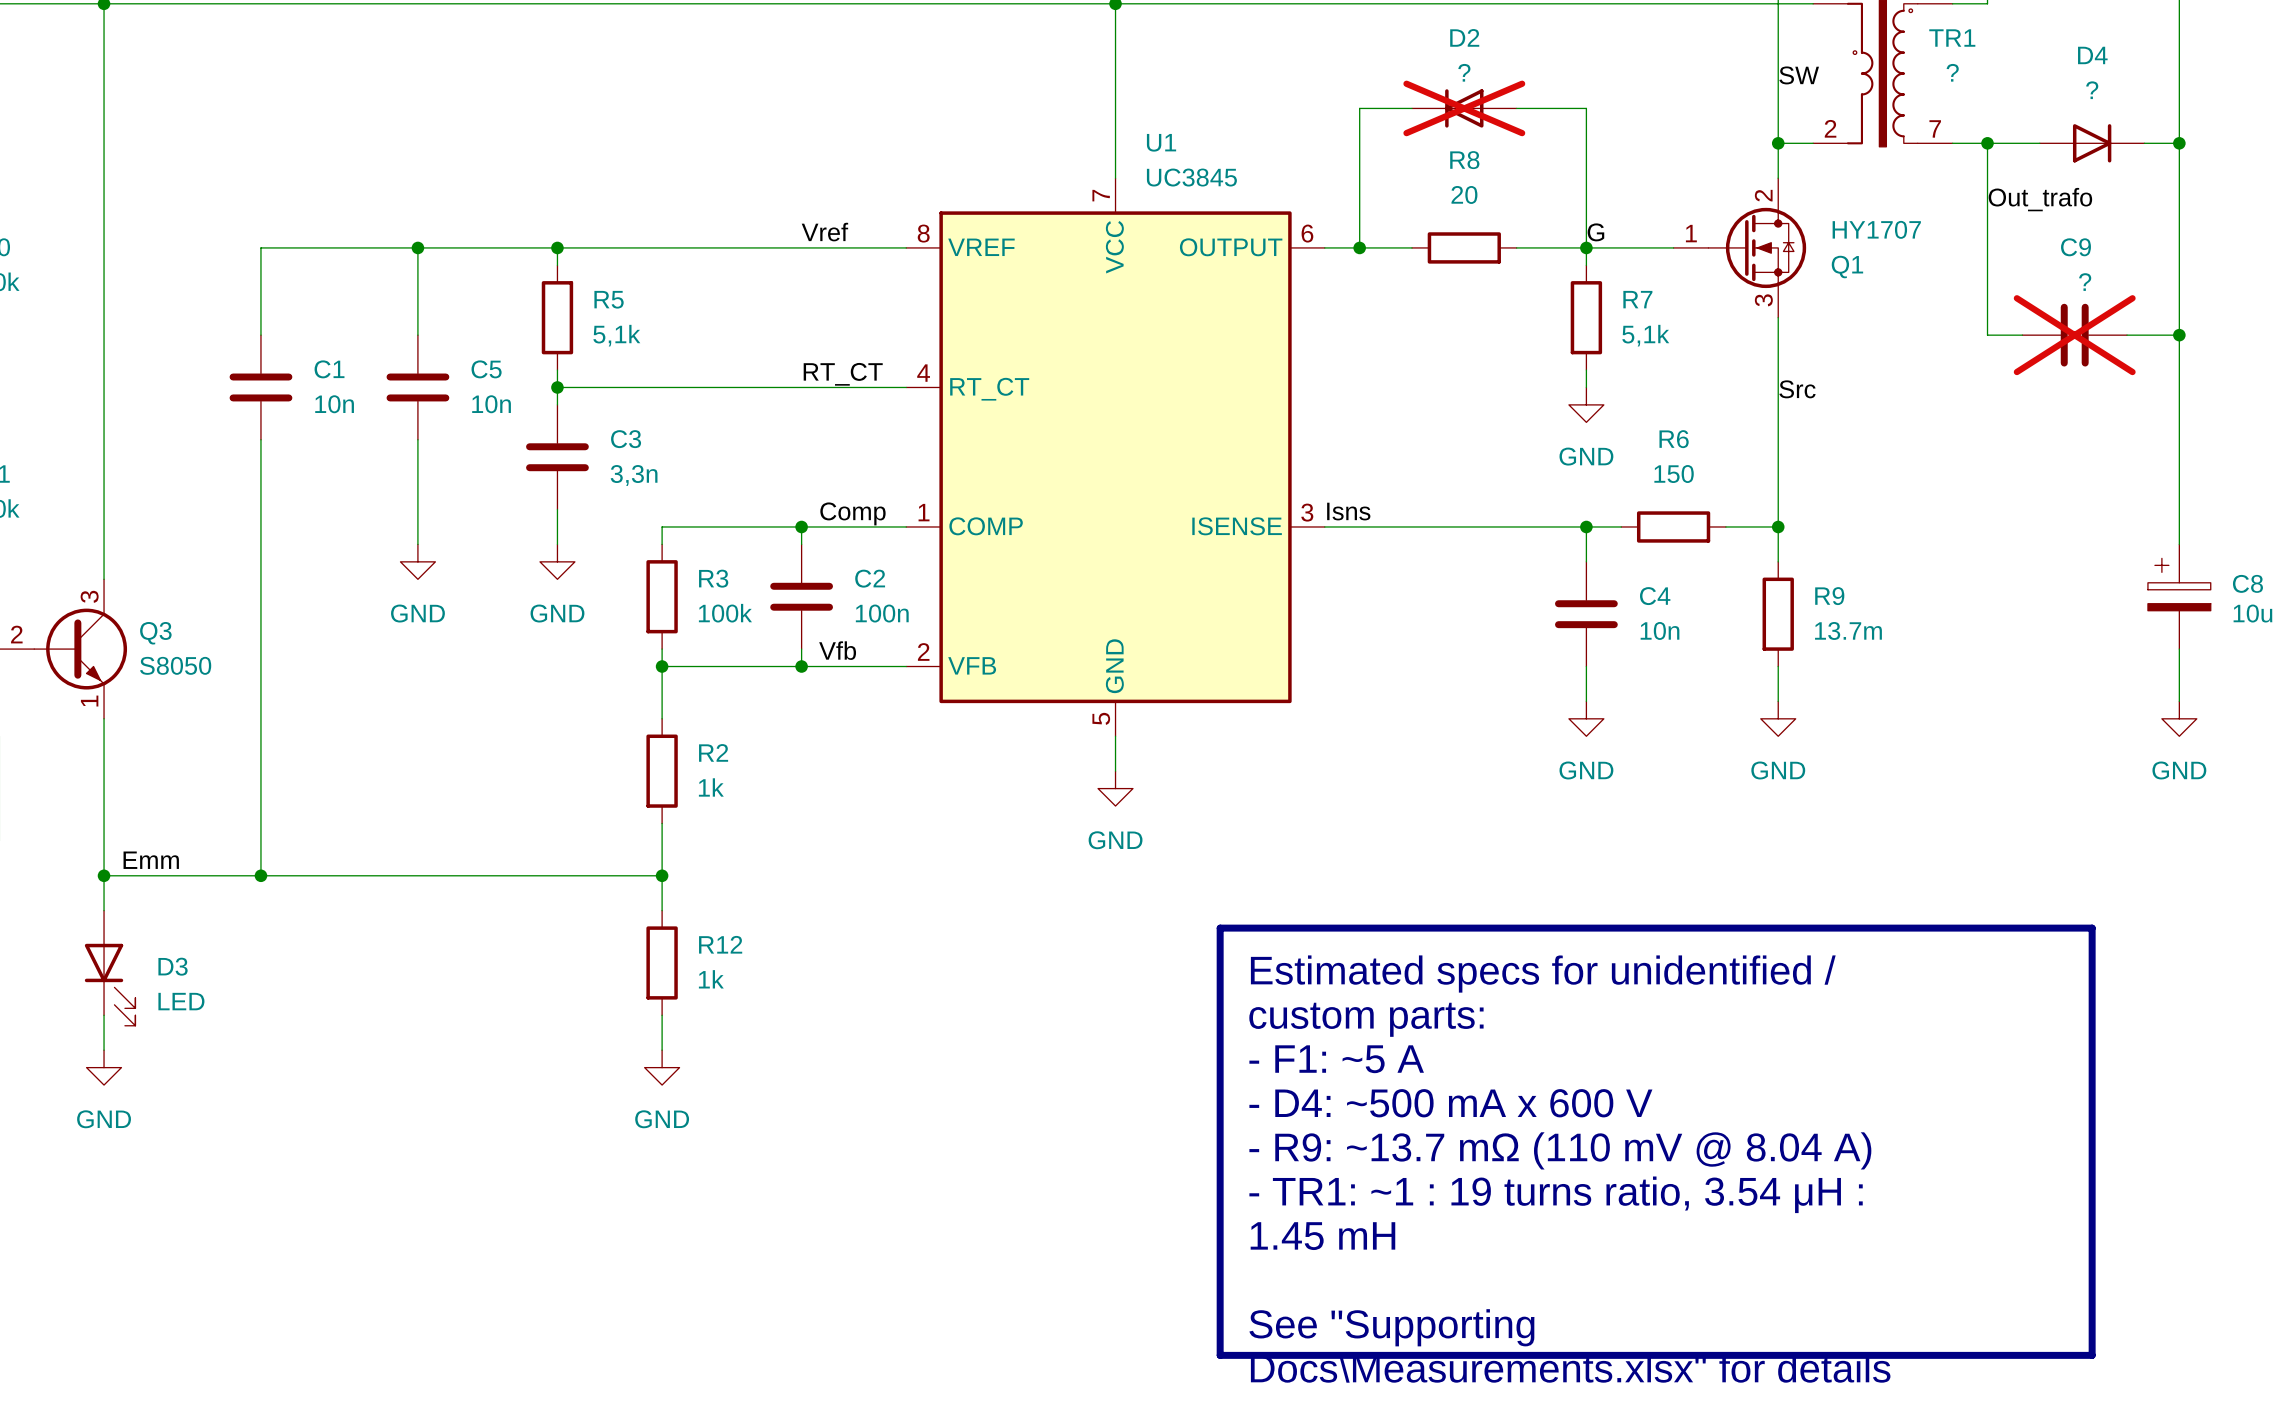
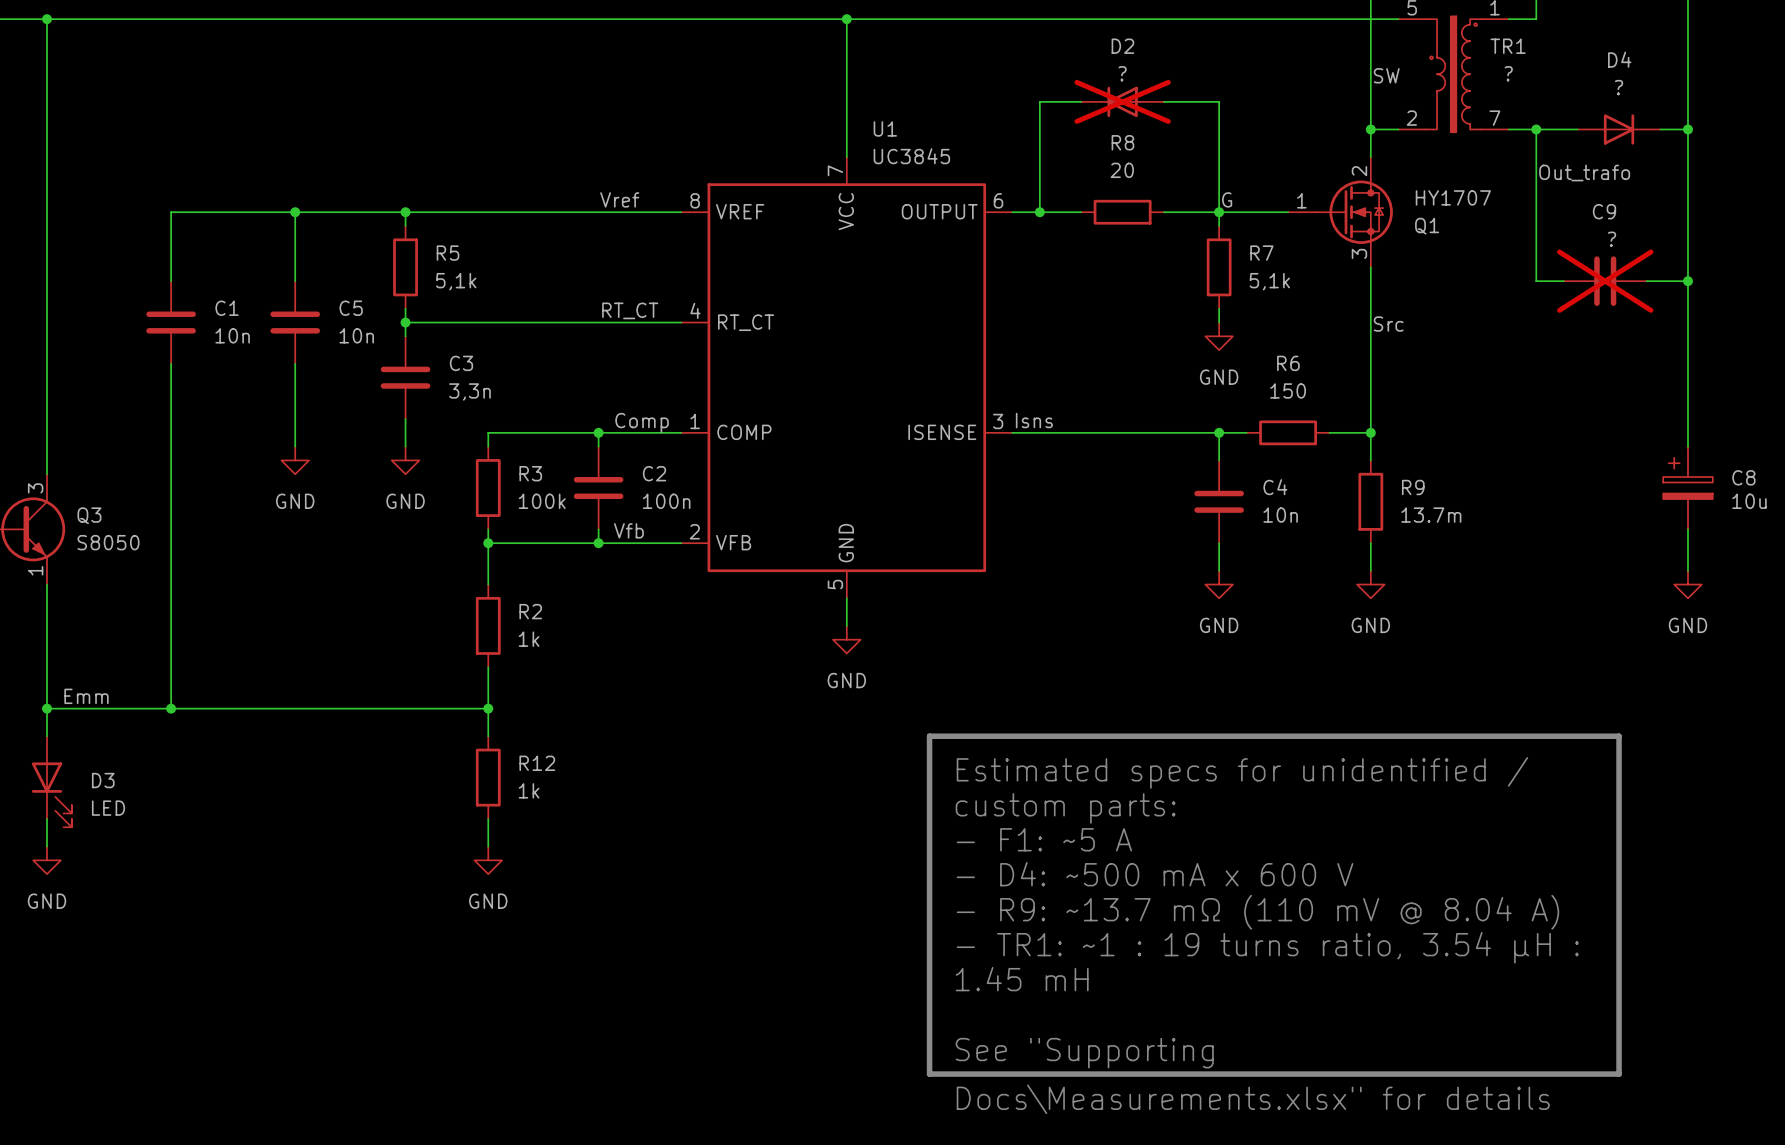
line: (1220, 928) (2092, 928) -> (929, 750) (929, 736) (1619, 736) (1619, 750)
text position: Estimated specs for unidentified / (1543, 974) -> Estimated specs for unidentified / (1242, 772)
text position: custom parts: (1366, 1019) -> custom parts: (1065, 808)
text position: - F1: ~5 A (1336, 1059) -> - F1: ~5 A (1044, 839)
text position: - D4: ~500 mA x 600 V (1450, 1103) -> - D4: ~500 mA x 600 V (1155, 874)
text position: - R9: ~13.7 mΩ (110 mV @ 8.04 A) (1560, 1150) -> - R9: ~13.7 mΩ (110 mV @ 8.04 A) (1257, 912)
text position: - TR1: ~1 : 19 turns ratio, 3.54 μH : (1556, 1194) -> - TR1: ~1 : 19 turns ratio, 3.54 μH : (1267, 947)
text position: 1.45 mH (1322, 1236) -> 1.45 mH (1022, 979)
text position: See "Supporting (1391, 1327) -> See "Supporting (1084, 1053)
line: (1220, 1337) (1220, 1355) (2092, 1355) (2092, 1337) -> (929, 1074) (1619, 1074)

